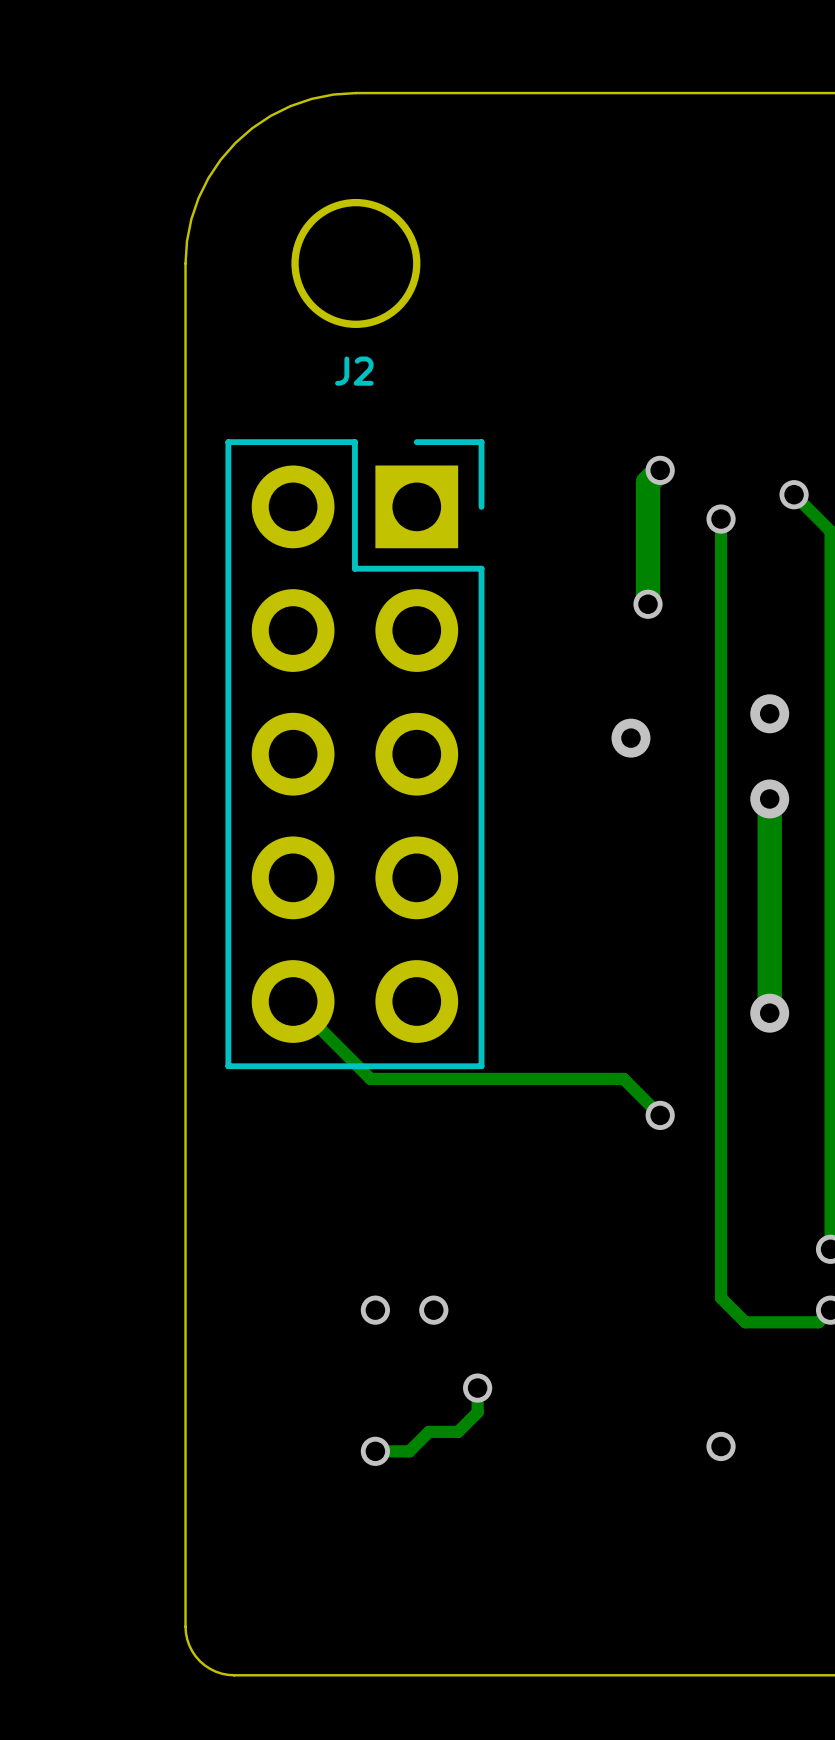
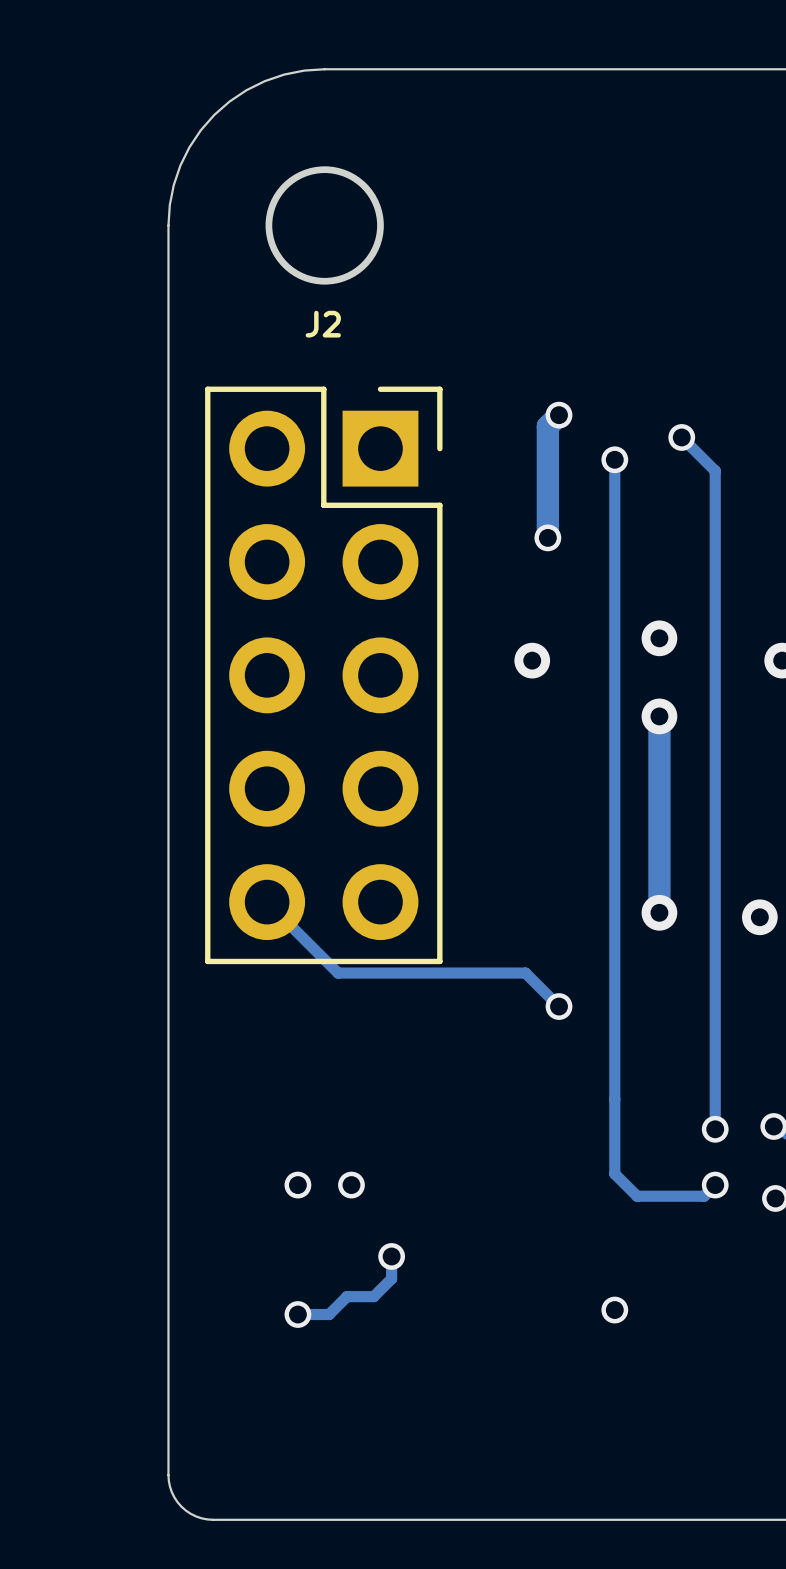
board edge: (404, 93) (355, 93) (311, 98) (290, 106) (252, 128) (235, 142) (208, 178) (198, 198) (186, 241) (185, 1632) (189, 1645) (195, 1656) (204, 1665) (215, 1671) (234, 1675) (282, 1675) -> (324, 69) (284, 74) (264, 81) (246, 90) (214, 115) (189, 147) (173, 185) (169, 205) (168, 1475) (171, 1492) (181, 1506) (196, 1516) (213, 1519)
round board edge position: (355, 263) -> (324, 225)
J2 position: (354, 754) -> (323, 675)
track: (293, 1001) (370, 1078) (419, 1078) -> (267, 902) (338, 973)

